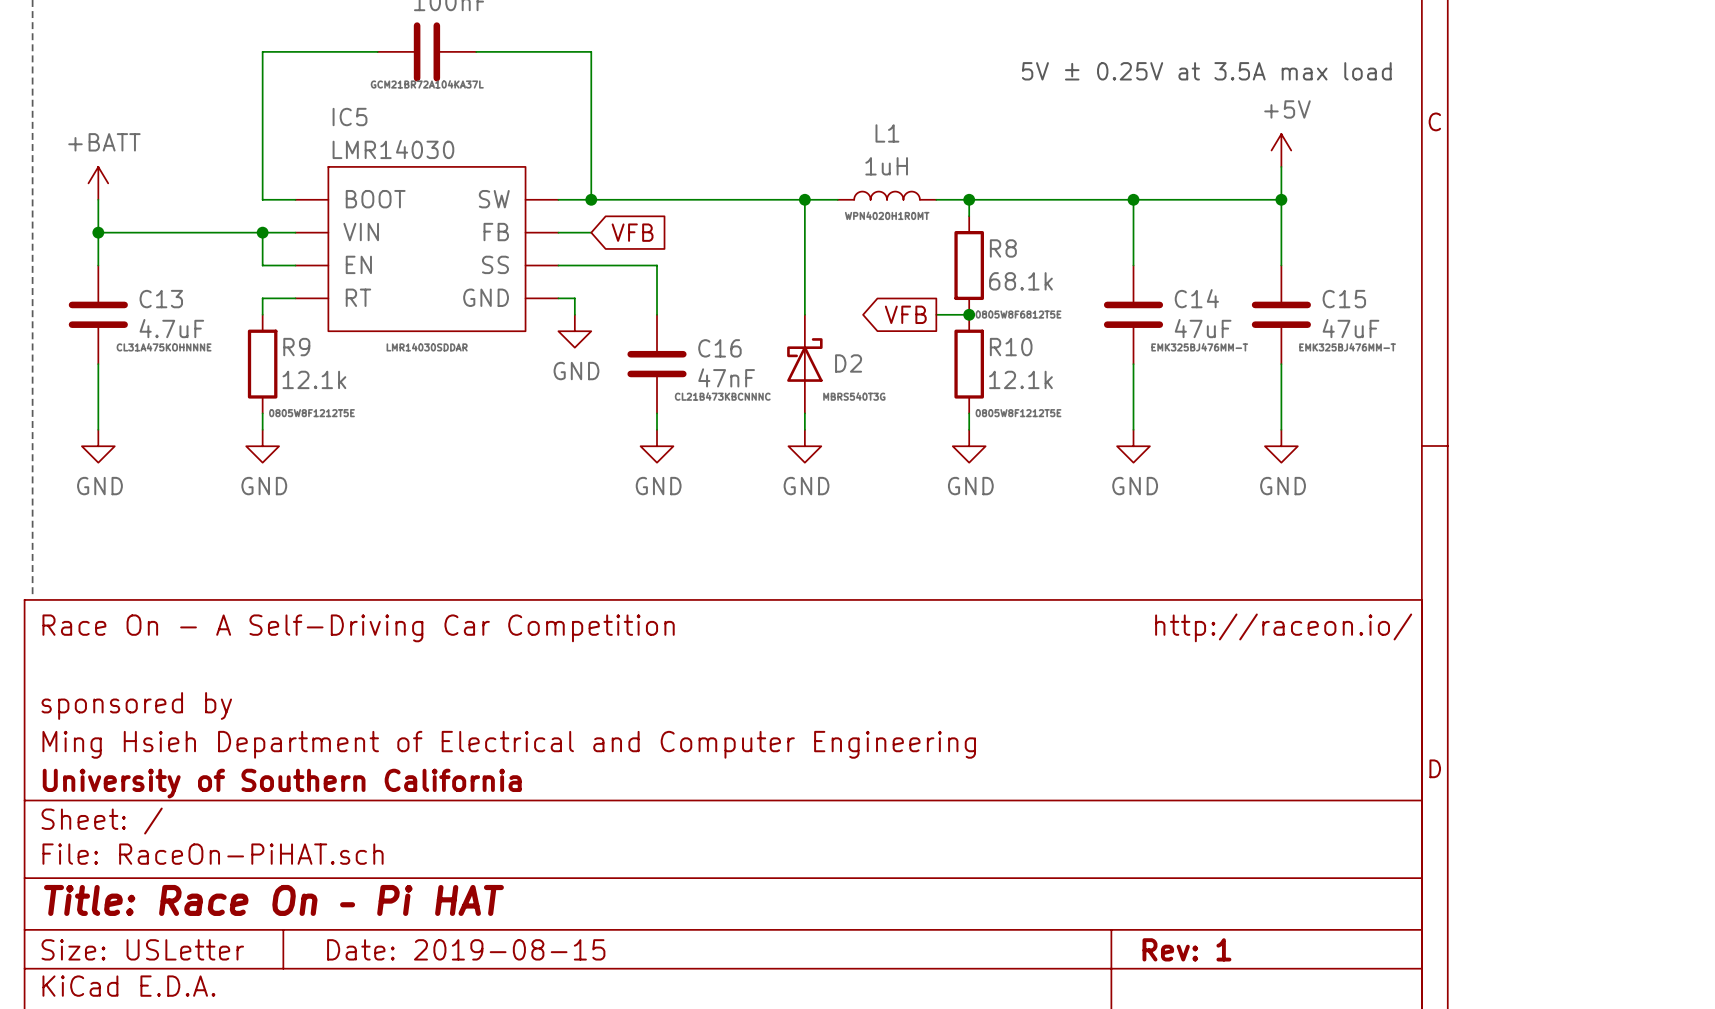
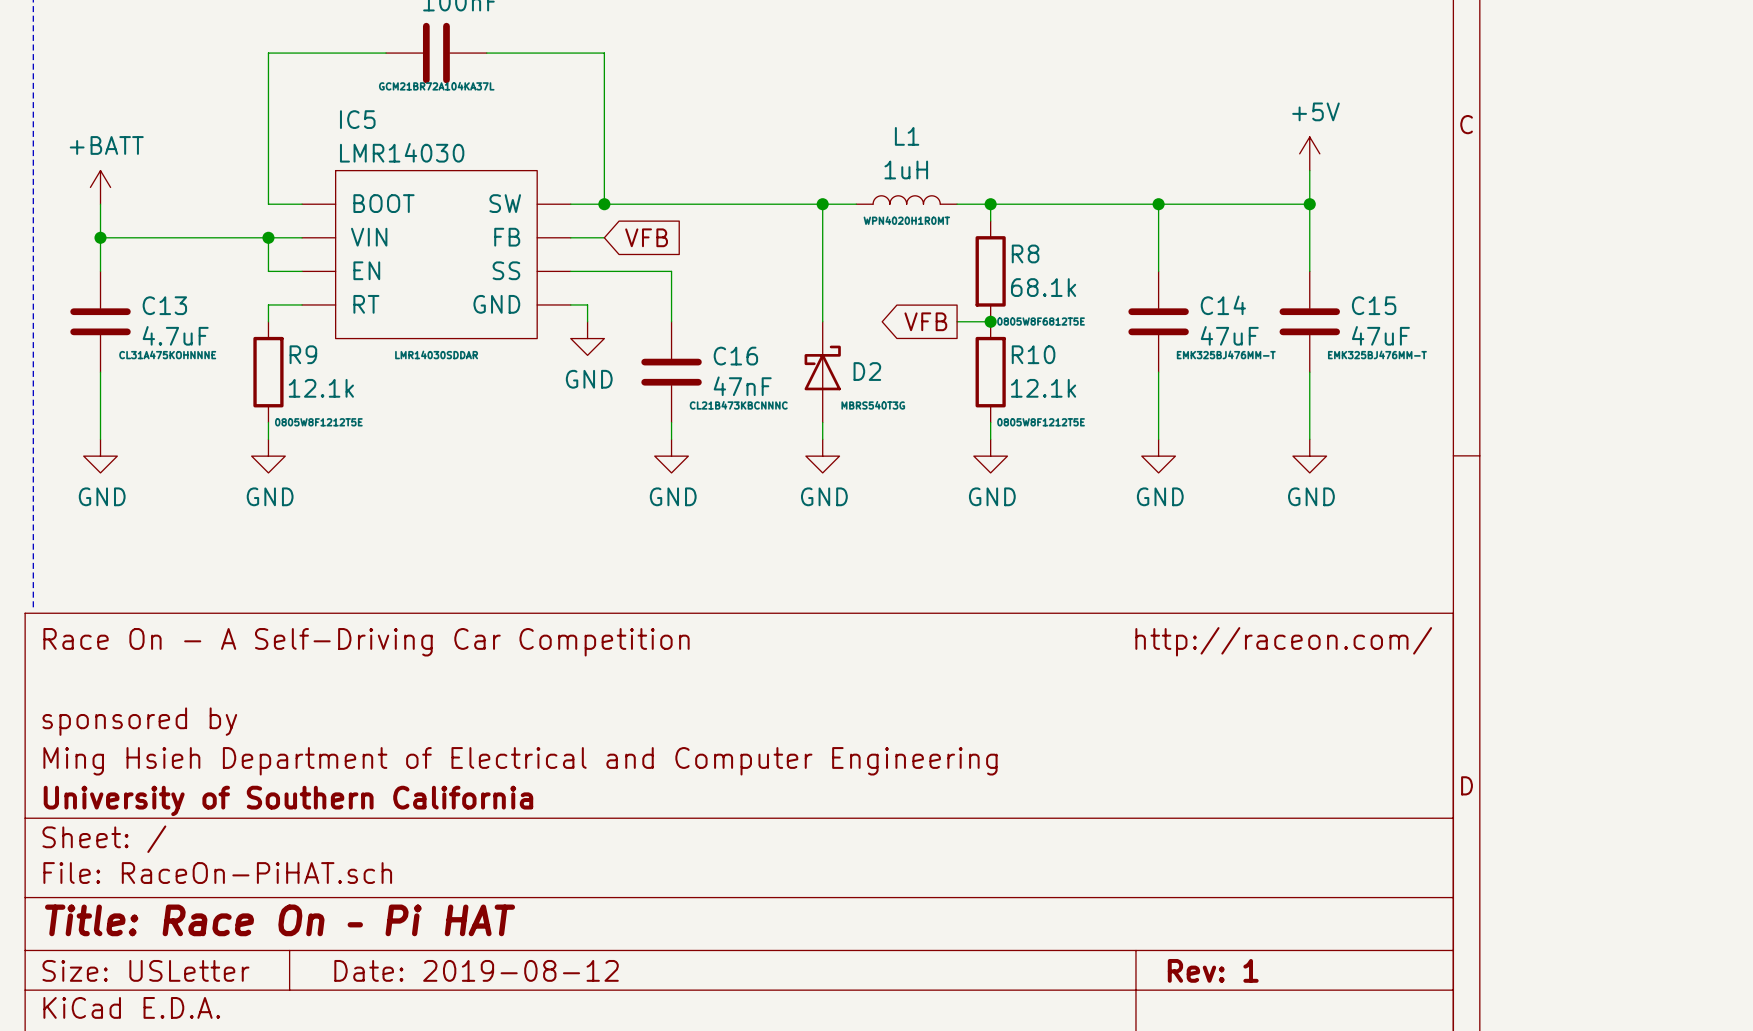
text: 5V ± 0.25V at 3.5A max load (1206, 71) -> none
title block: Race On - A Self-Driving Car Competition http://raceon.io/ (727, 627) -> Race On - A Self-Driving Car Competition http://raceon.com/ (737, 641)
title block: Date: 2019-08-15 (466, 949) -> Date: 2019-08-12 (476, 970)

